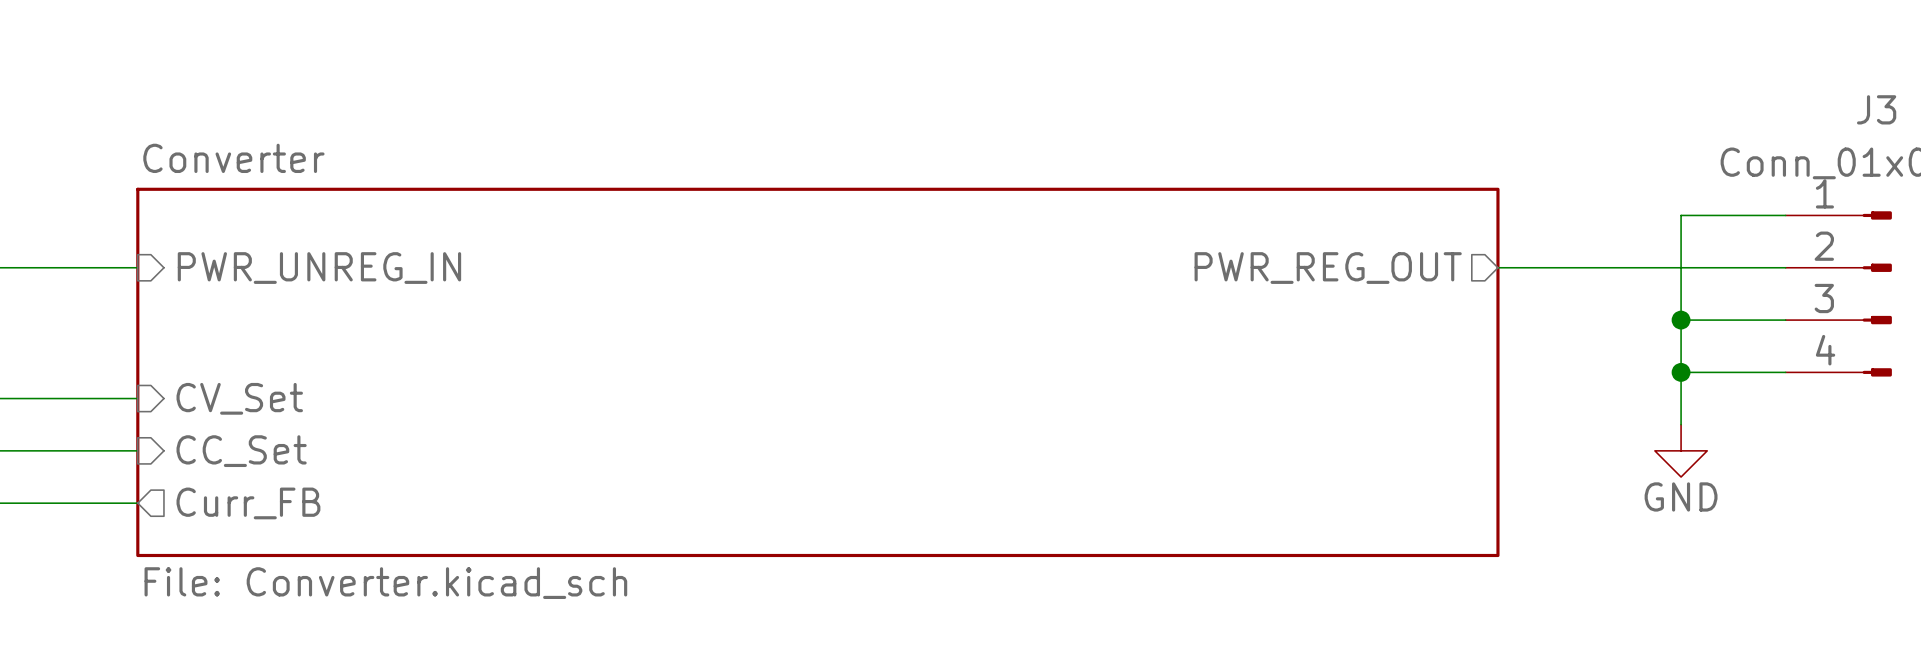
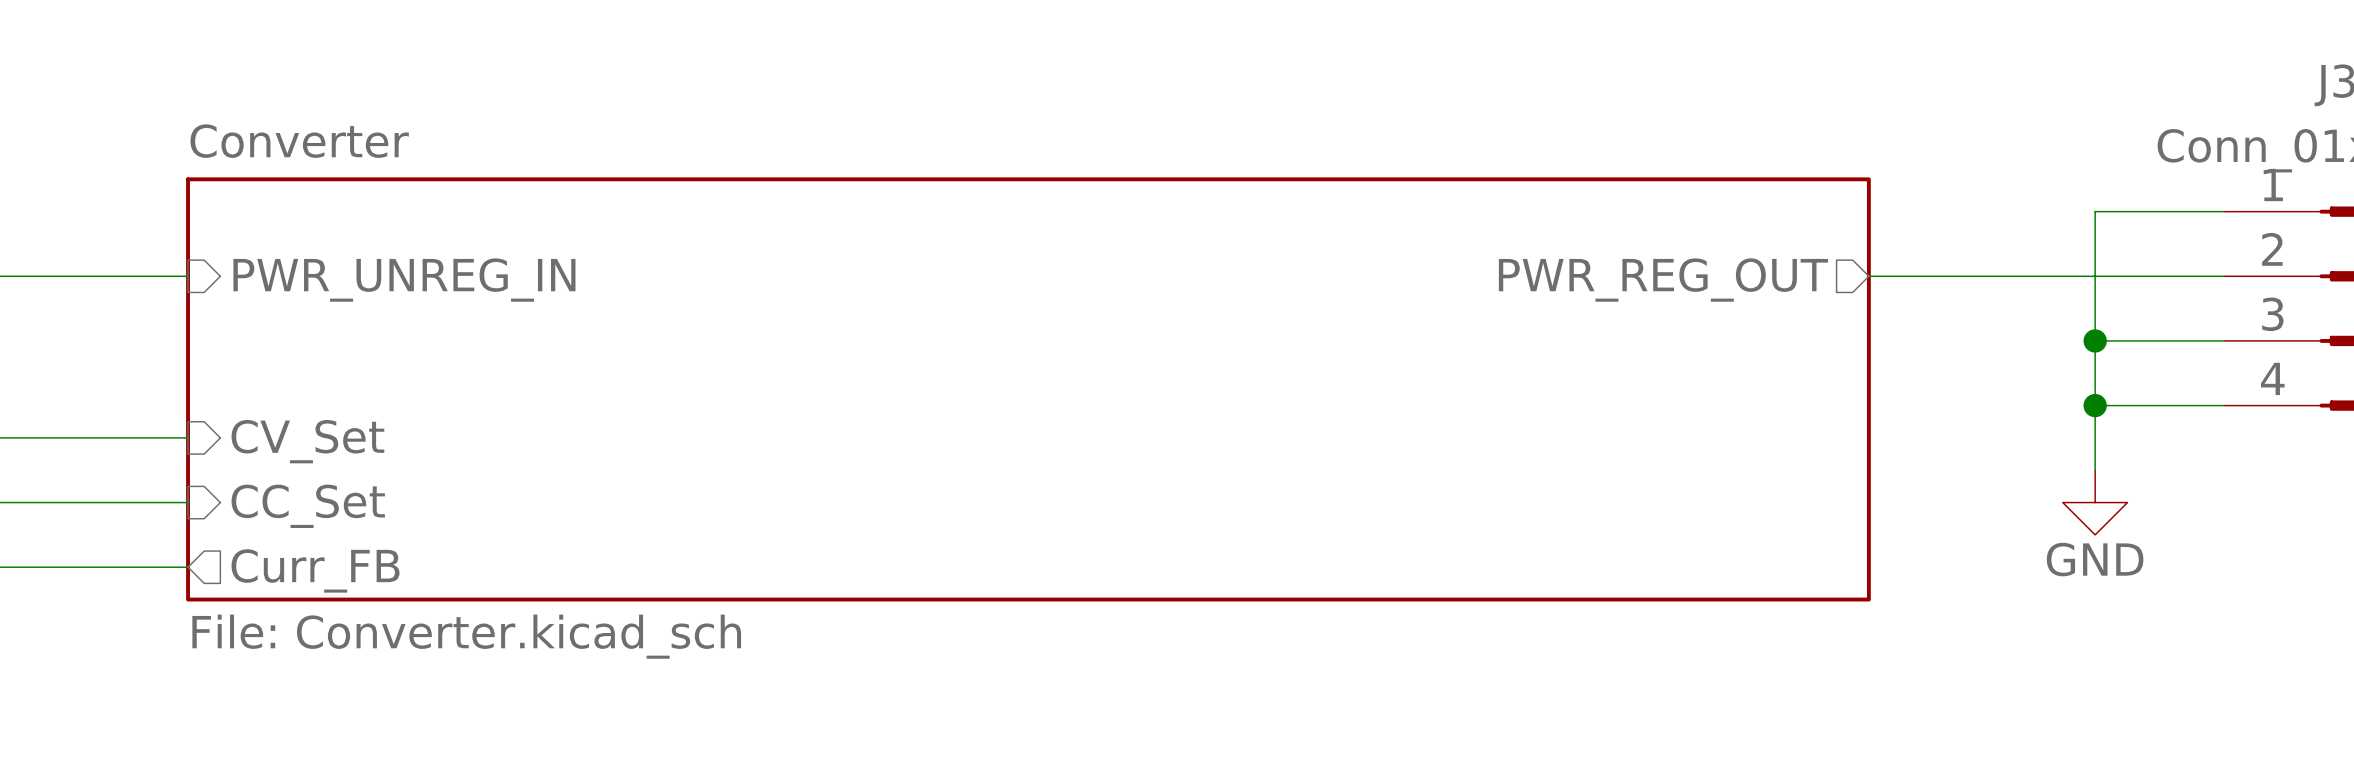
sheet Converter shape: [136, 187, 1500, 558] -> [186, 177, 1871, 602]

